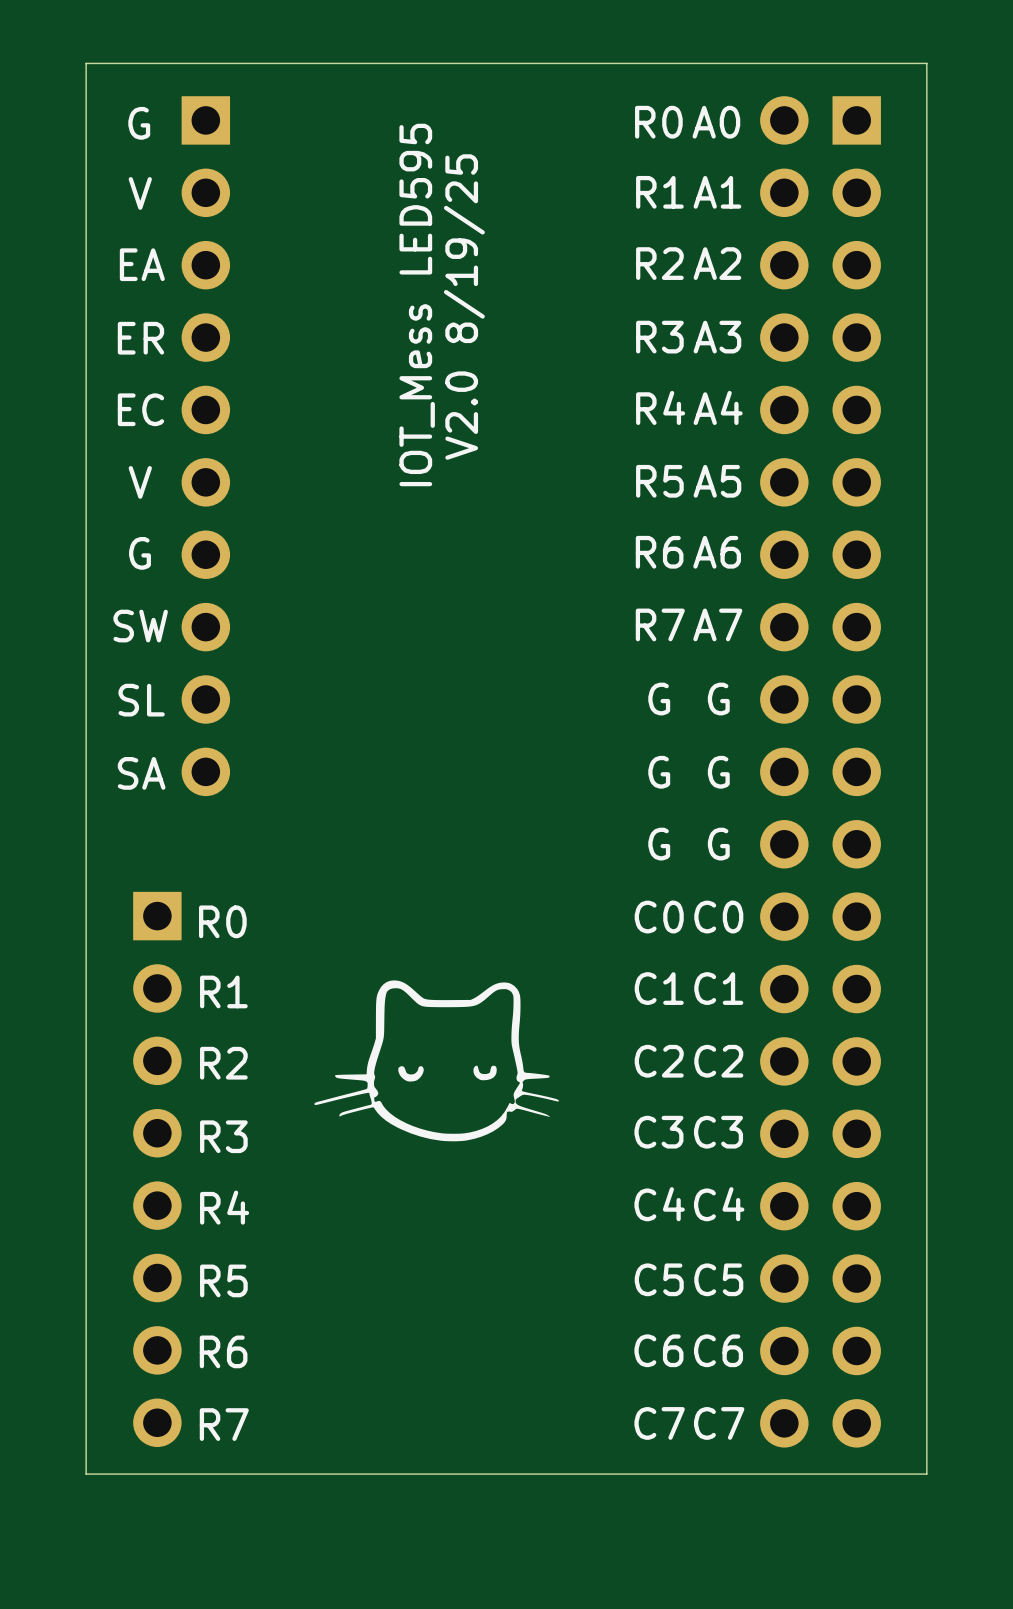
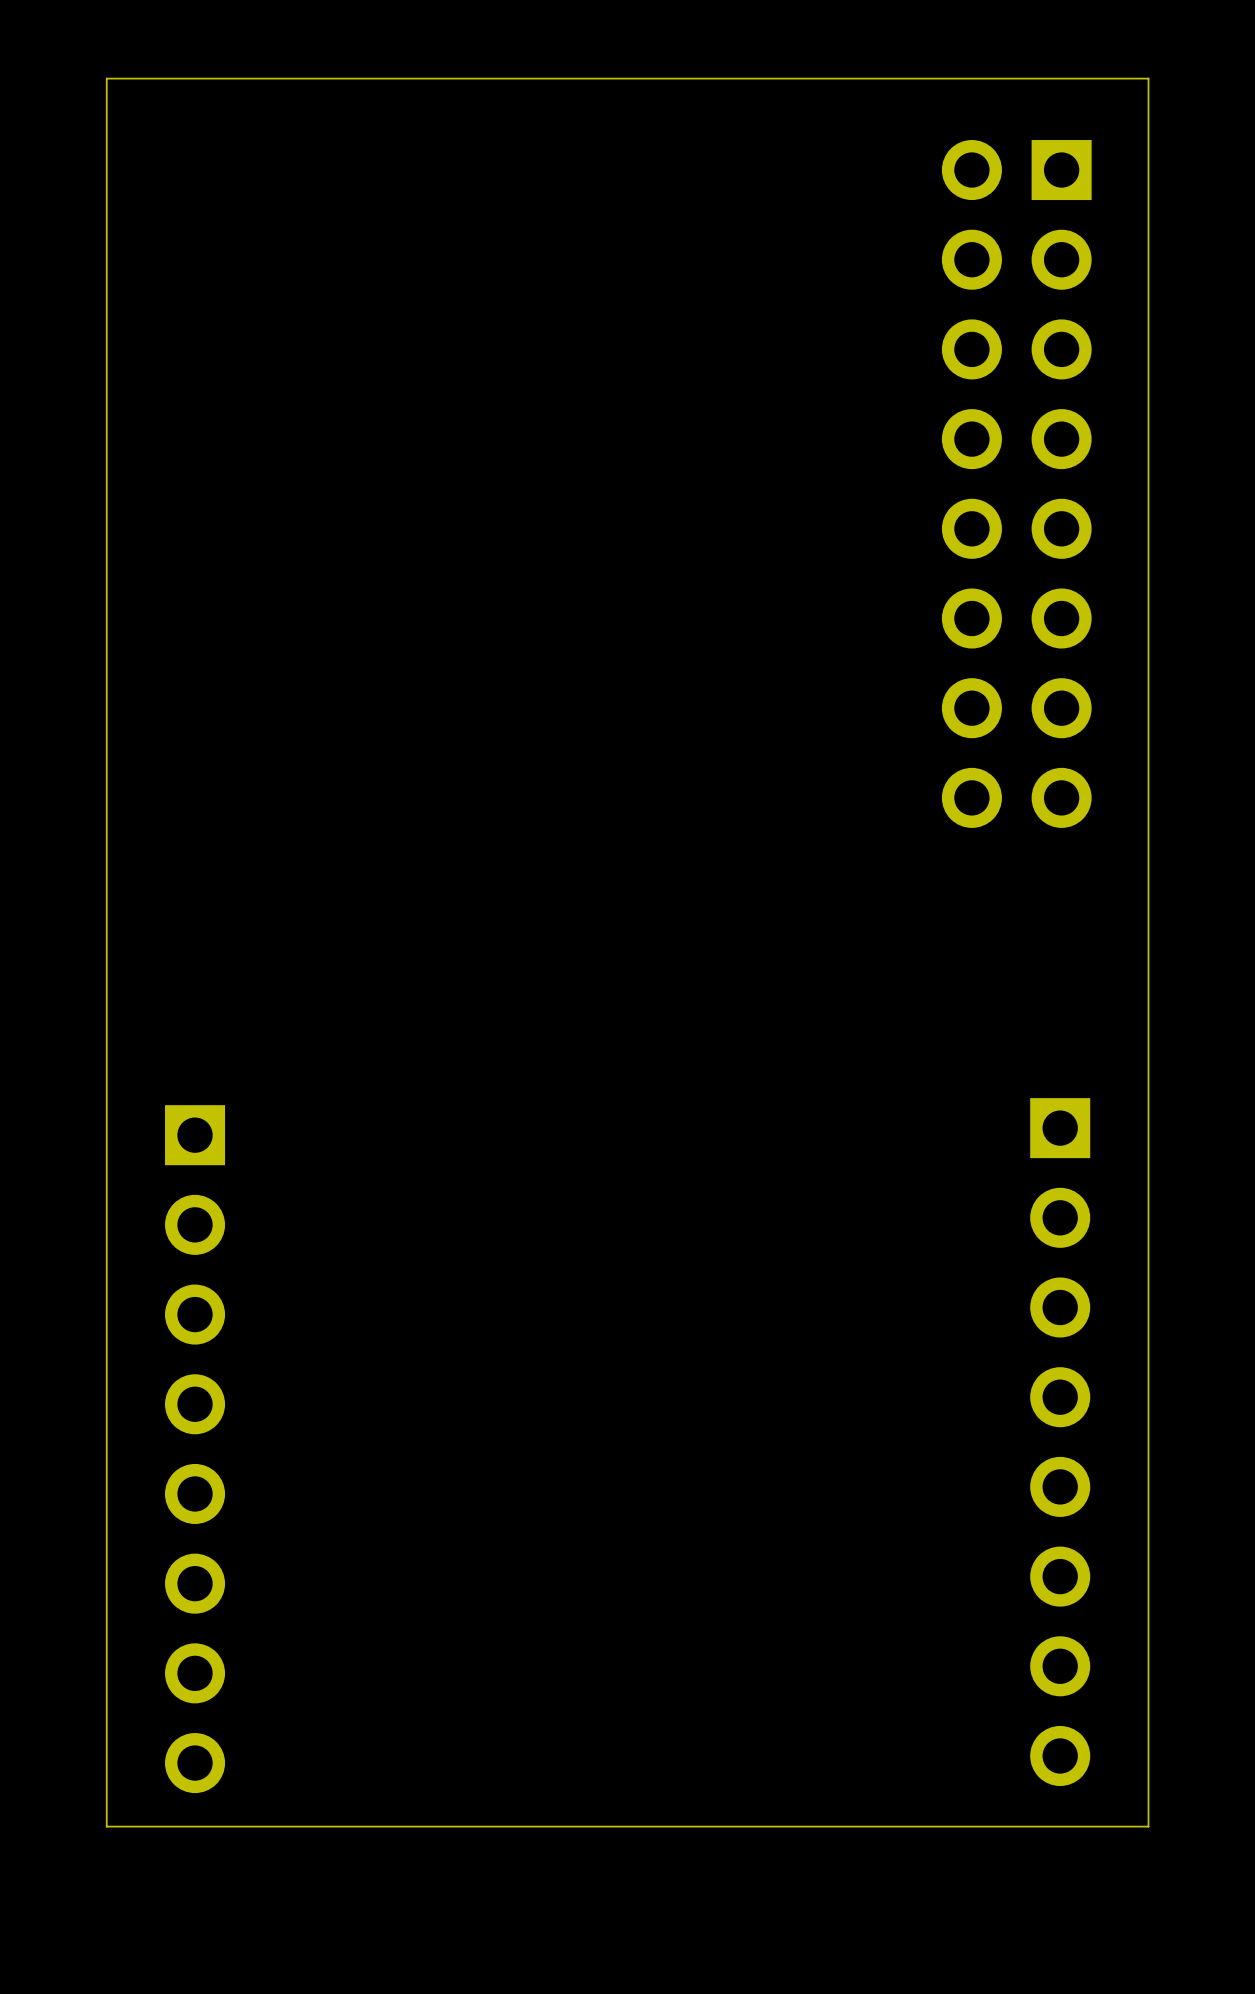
text: R0 (658, 122) -> none
text: A0 (716, 122) -> none
text: G (139, 123) -> none
text: R1 (659, 192) -> none
text: A1 (717, 192) -> none
text: V (140, 193) -> none
text: R2 (659, 263) -> none
text: A2 (717, 263) -> none
text: EA (142, 264) -> none
text: IOT_Mess LED595 (417, 304) -> none
text: V2.0 8/19/25 (464, 307) -> none
text: R3 (659, 337) -> none
text: A3 (717, 337) -> none
text: ER (140, 338) -> none
part: none -> (1016, 483)
text: R4 (660, 407) -> none
text: A4 (718, 407) -> none
text: EC (140, 409) -> none
part: (205, 446) -> none
text: R5 (659, 481) -> none
text: A5 (717, 481) -> none
text: V (140, 482) -> none
text: R6 (659, 552) -> none
text: A6 (717, 552) -> none
text: G (140, 553) -> none
text: R7 (660, 624) -> none
text: A7 (717, 624) -> none
text: SW (140, 626) -> none
text: G (659, 699) -> none
text: G (718, 699) -> none
text: SL (141, 700) -> none
part: (820, 771) -> none
text: G (659, 772) -> none
text: G (718, 772) -> none
text: SA (141, 773) -> none
text: G (659, 844) -> none
text: G (718, 844) -> none
text: C0 (659, 917) -> none
text: C0 (718, 917) -> none
text: R0 (222, 921) -> none
drawing: [314, 980, 559, 1142] -> none
text: C1 (659, 988) -> none
text: C1 (718, 988) -> none
text: R1 (223, 991) -> none
text: C2 (659, 1061) -> none
text: C2 (718, 1061) -> none
text: R2 (223, 1063) -> none
text: C3 (658, 1132) -> none
text: C3 (718, 1132) -> none
text: R3 (223, 1136) -> none
part: none -> (1060, 1442)
text: C4 (659, 1204) -> none
text: C4 (719, 1204) -> none
text: R4 (224, 1207) -> none
text: C5 (659, 1279) -> none
text: C5 (718, 1279) -> none
text: R5 (223, 1280) -> none
text: C6 (658, 1350) -> none
text: C6 (718, 1350) -> none
text: R6 (223, 1351) -> none
text: C7 (659, 1423) -> none
text: C7 (719, 1423) -> none
text: R7 (224, 1424) -> none

